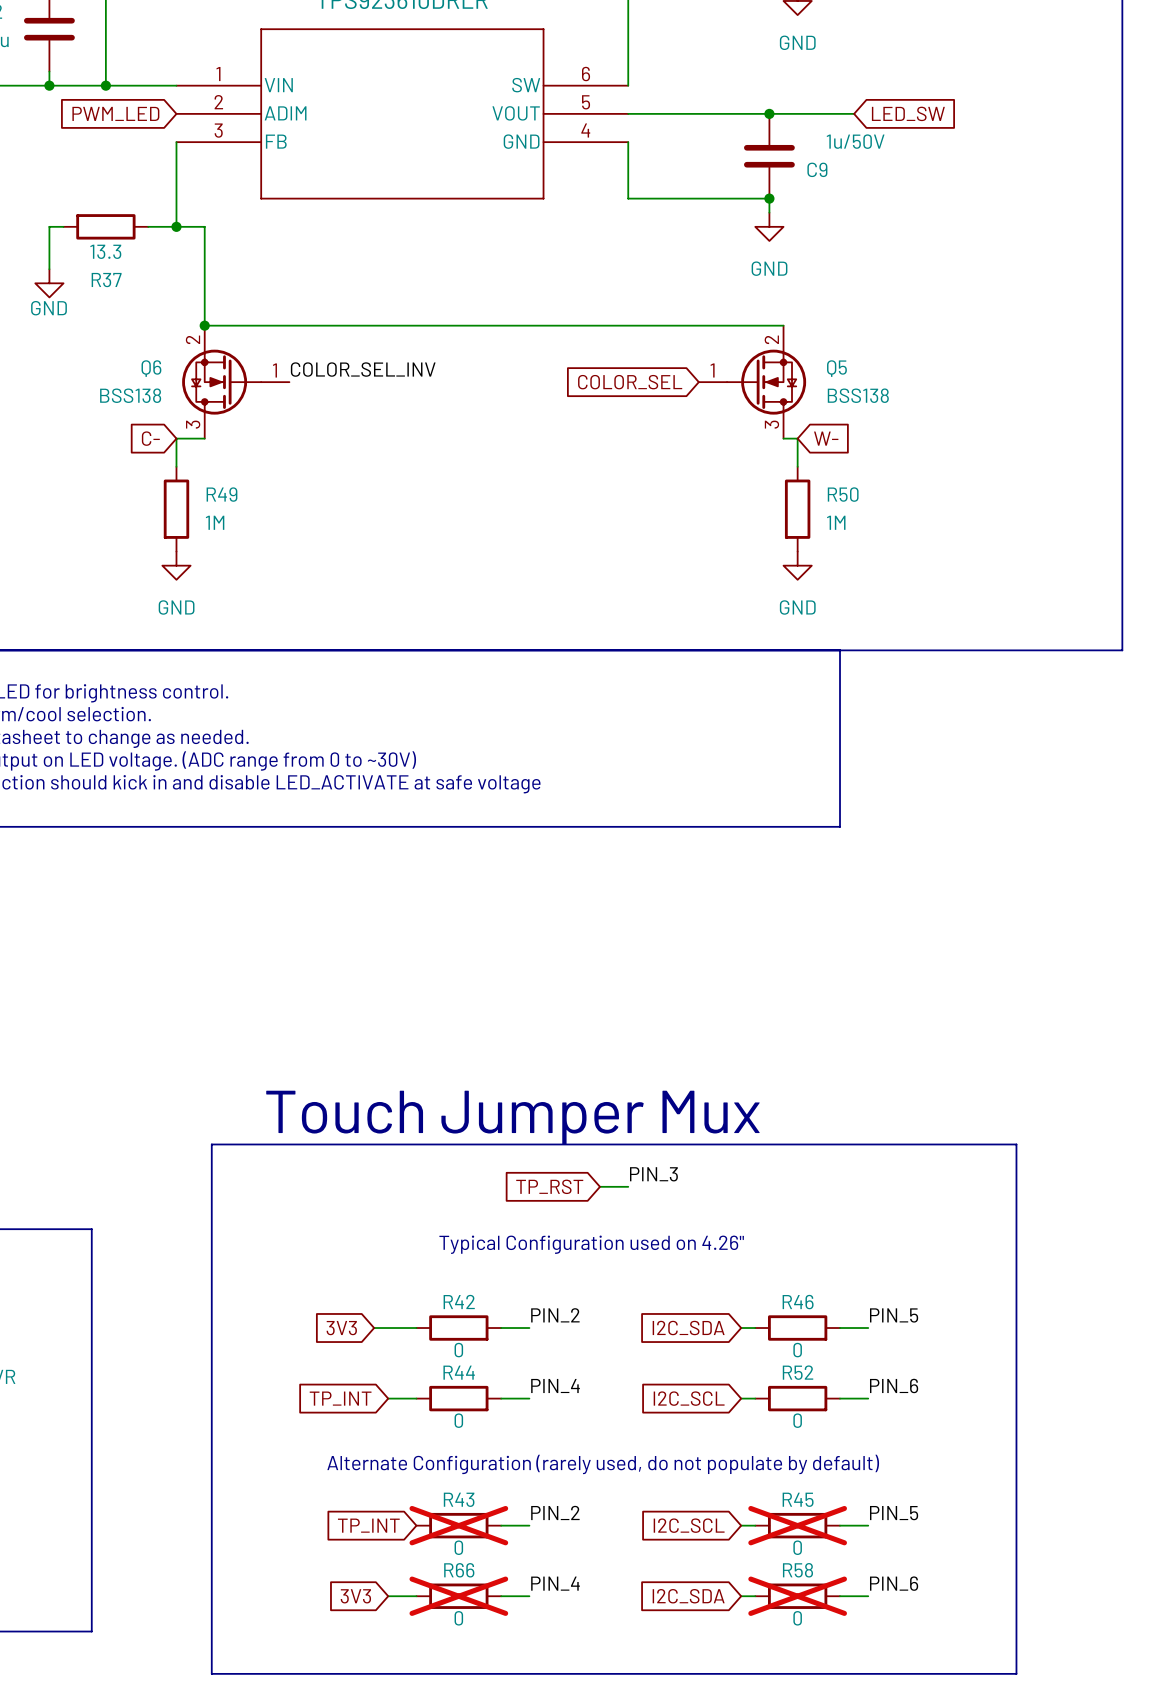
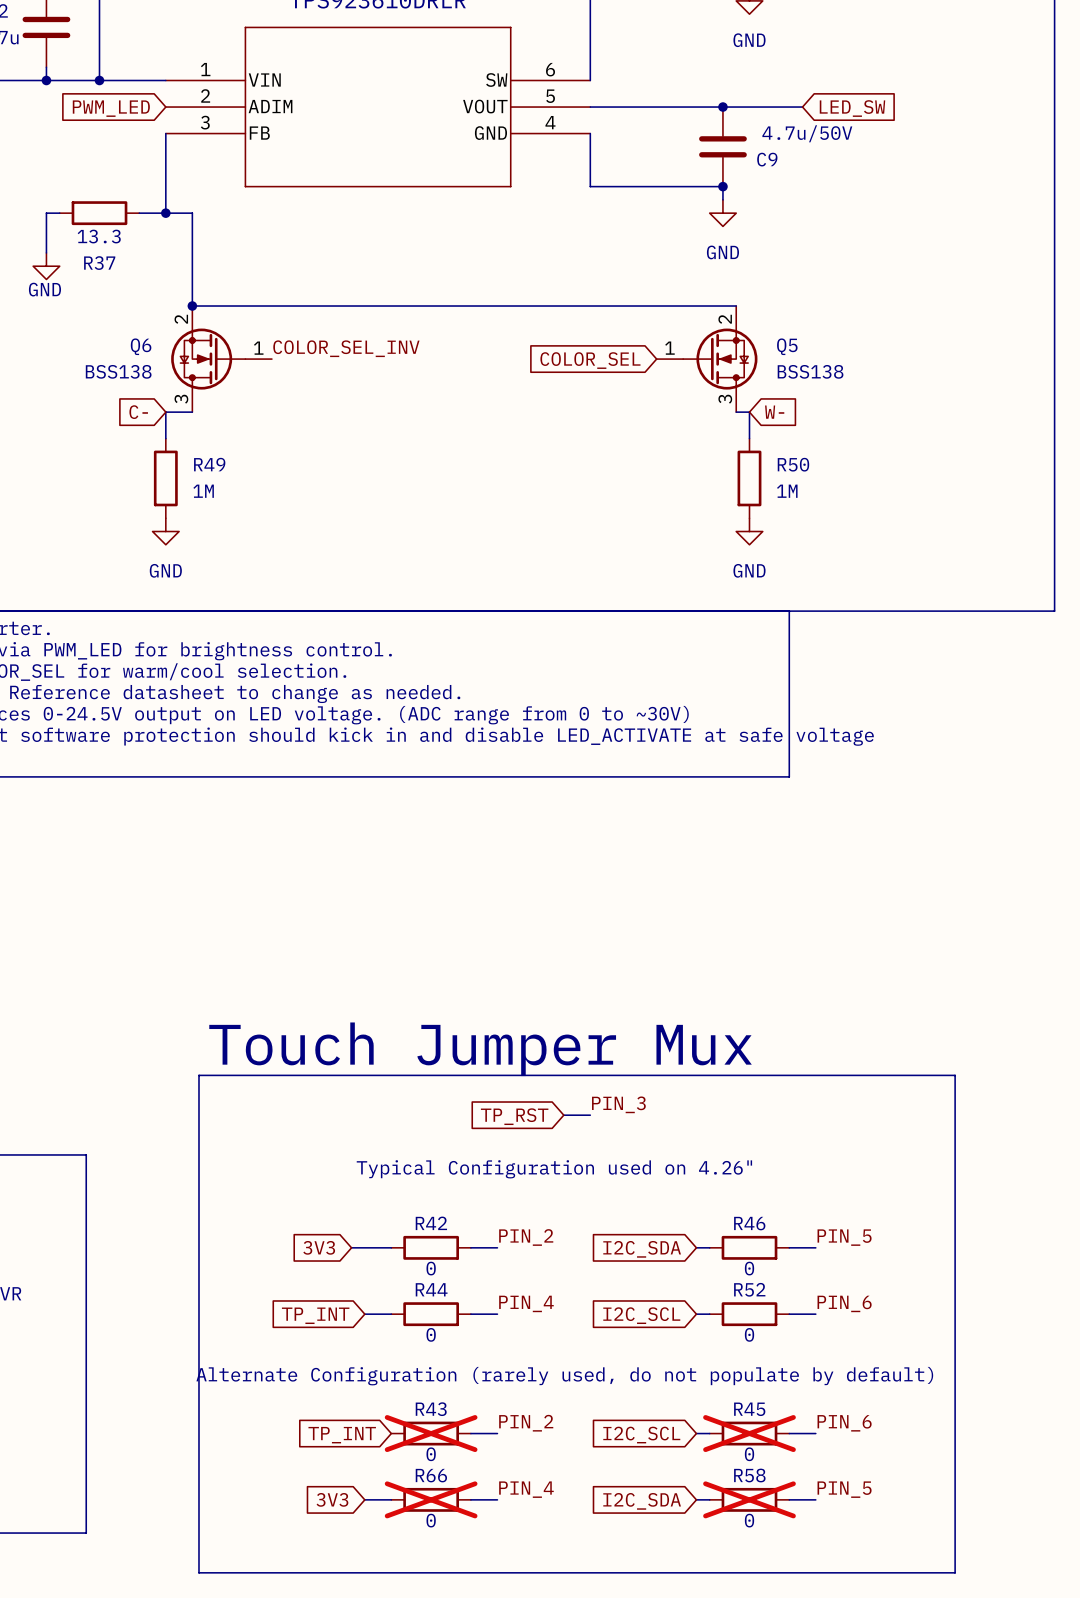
C9 value: 1u/50V (855, 141) -> 4.7u/50V (807, 133)
label: PIN_5 (894, 1513) -> PIN_6 (844, 1423)
label: PIN_6 (894, 1583) -> PIN_5 (844, 1489)

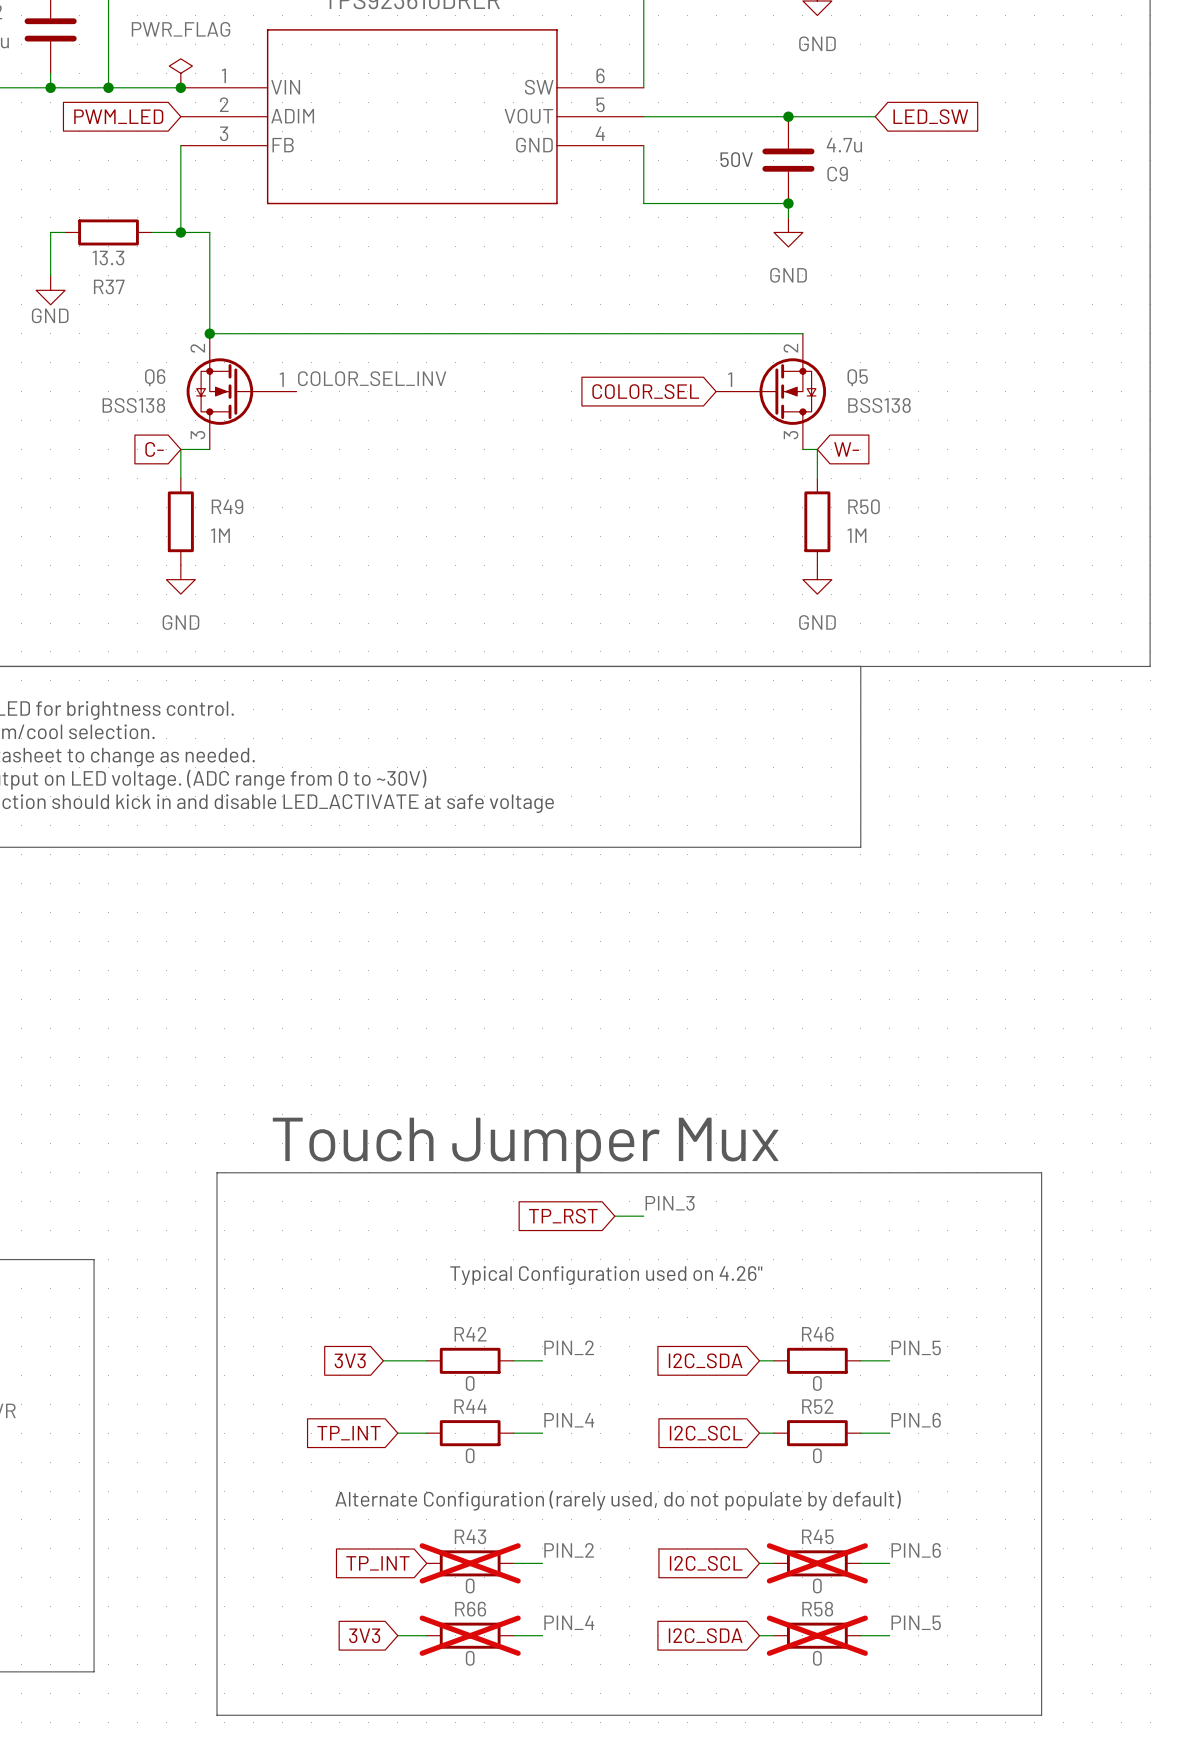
power symbol: none -> PWR_FLAG (180, 73)
junction: none -> (180, 87)
C9 value: 4.7u/50V (807, 133) -> 4.7u (844, 145)
text: none -> 50V (736, 159)

